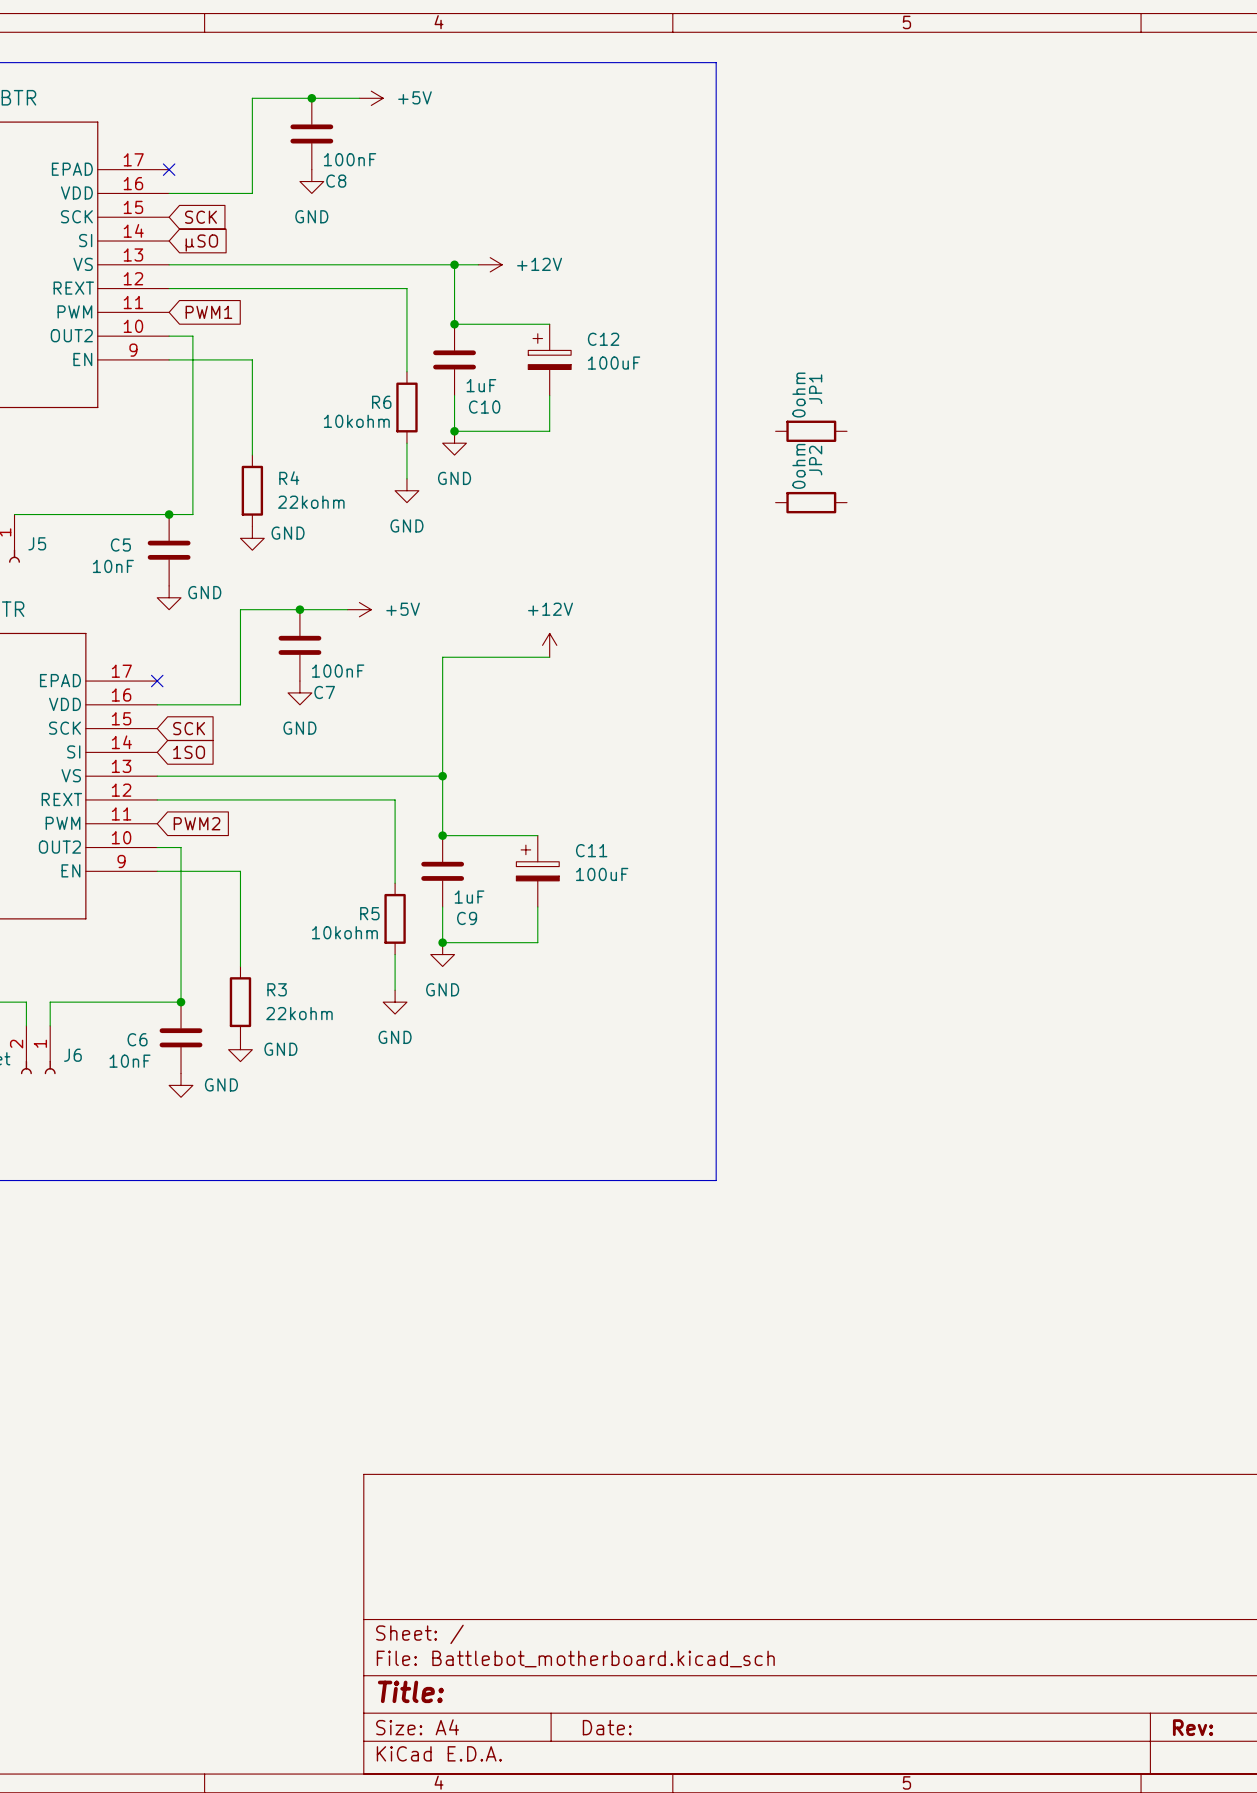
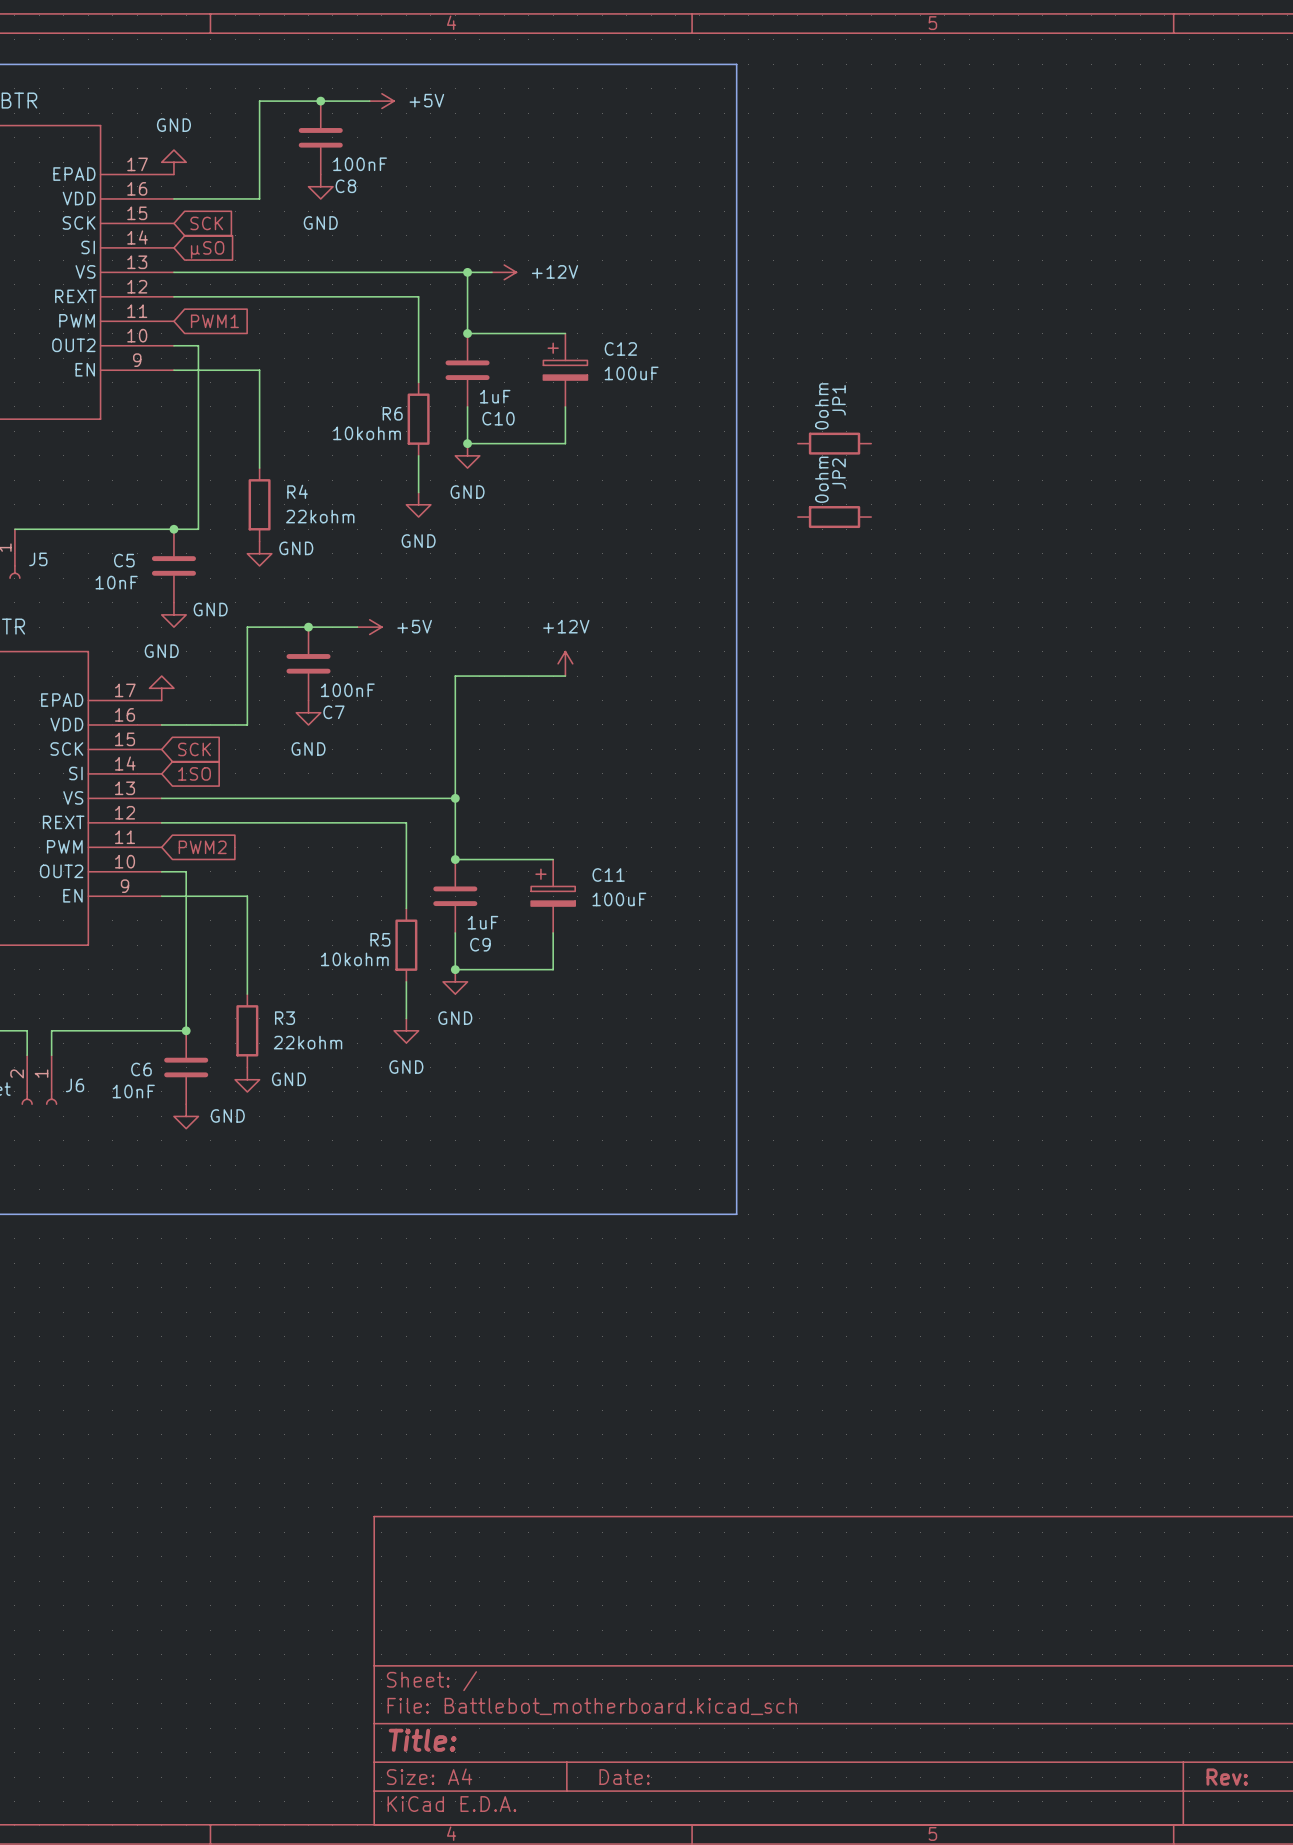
power symbol: none -> GND (173, 162)
no-connect mark: (169, 169) -> none
power symbol: none -> GND (161, 688)
no-connect mark: (157, 681) -> none

